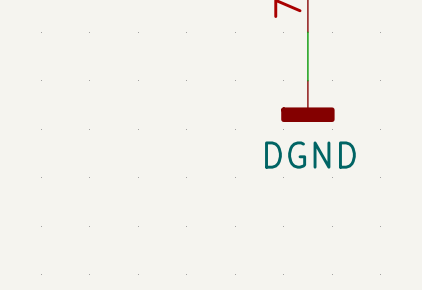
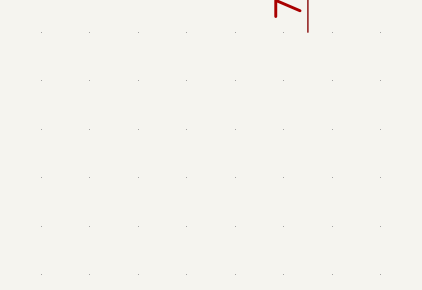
wire: (307, 32) (307, 80) -> none
power symbol: DGND (307, 101) -> none

